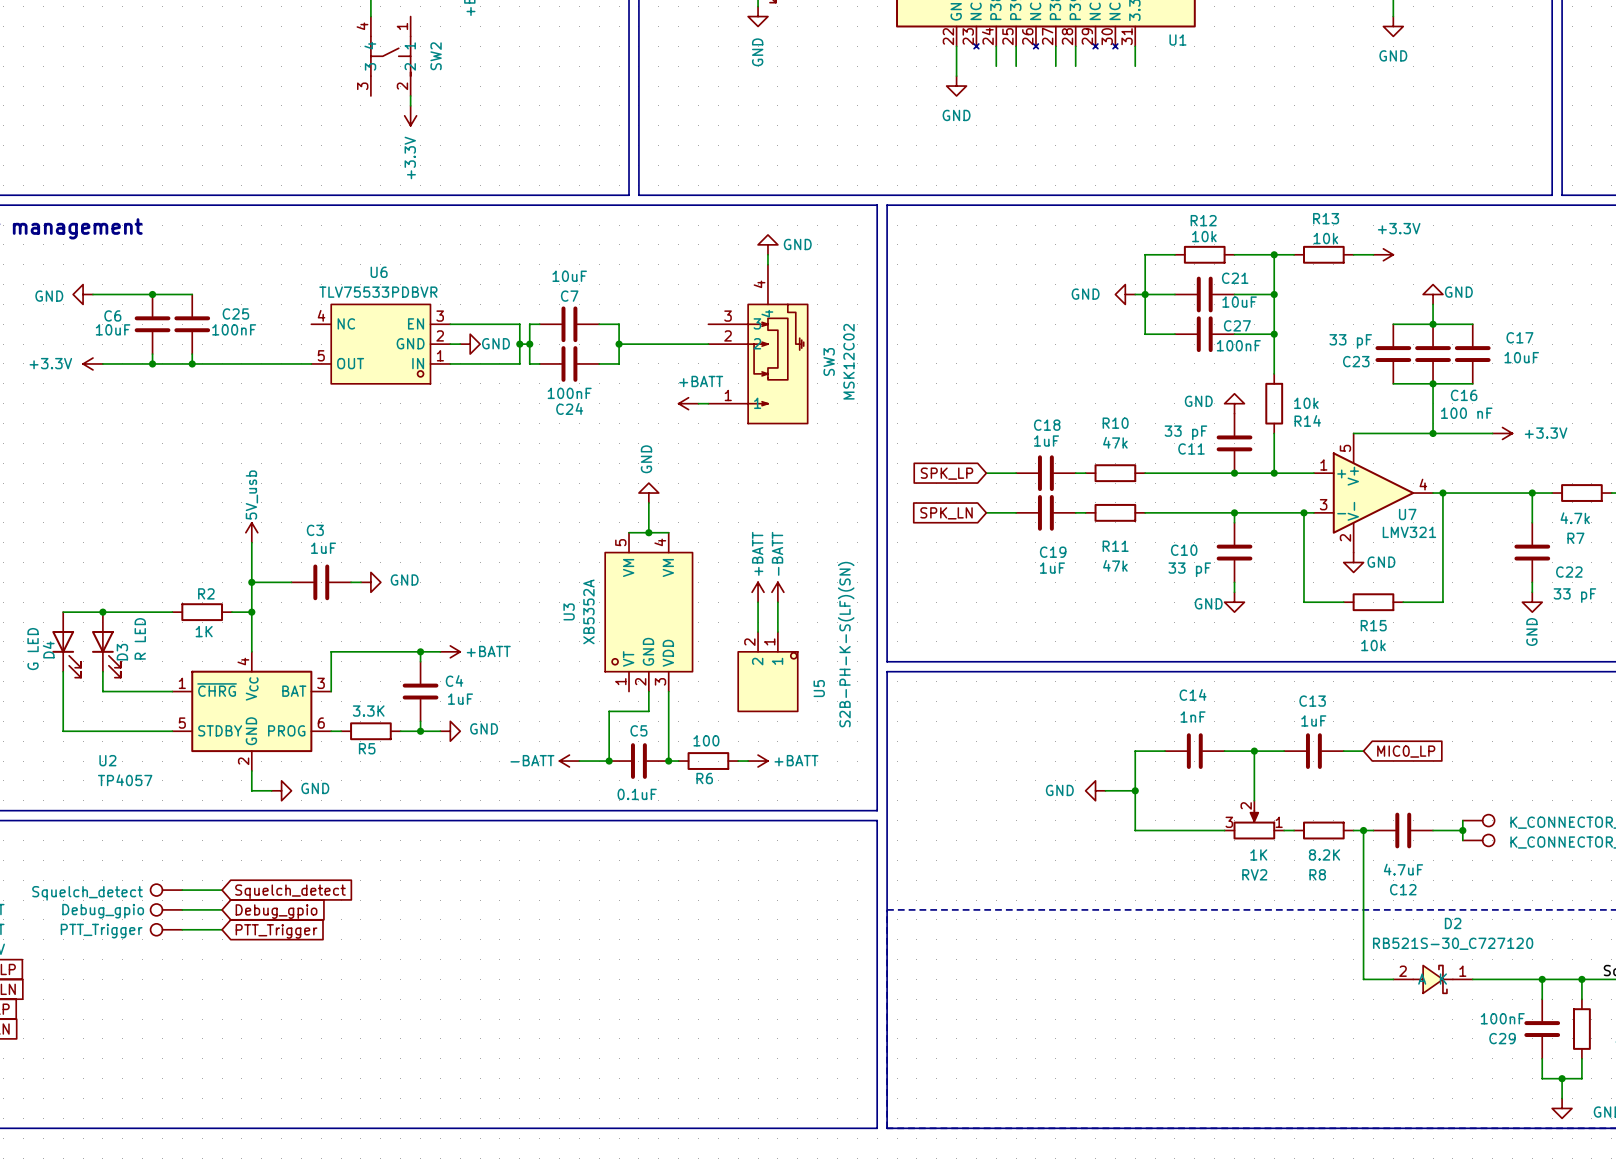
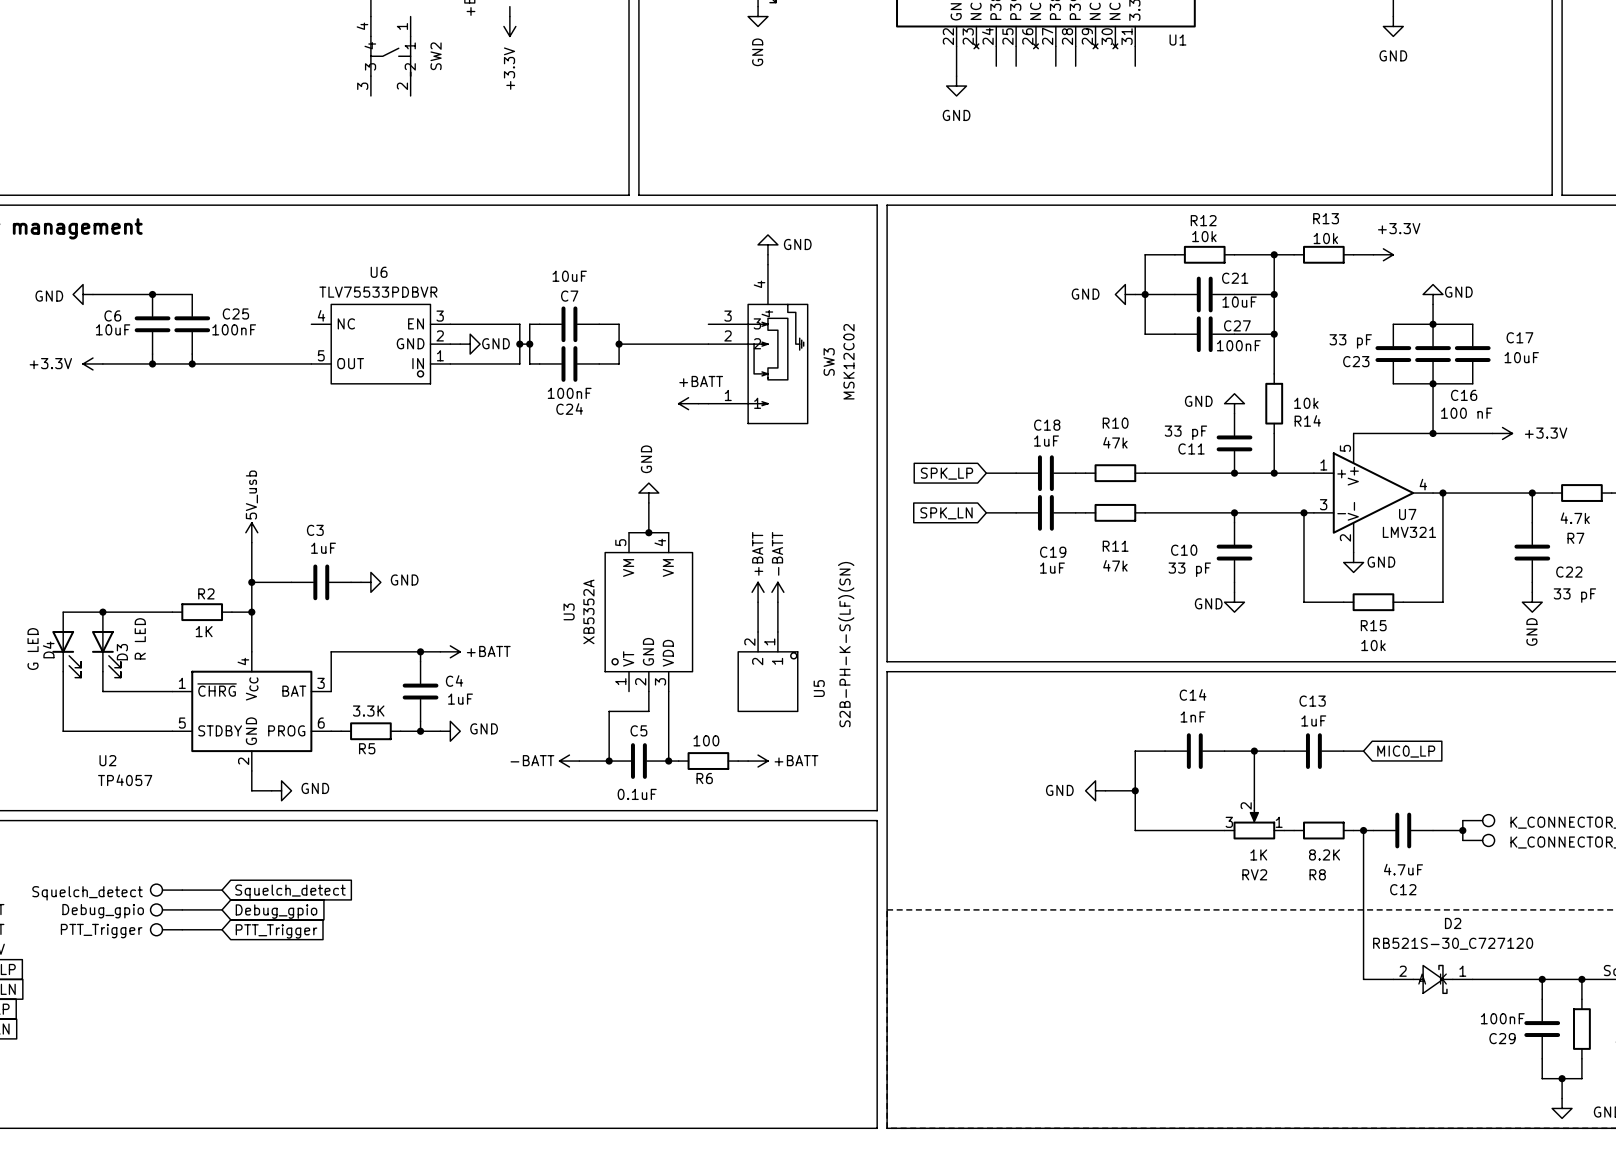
wire: (410, 95) (410, 105) -> (509, 6) (509, 16)
power symbol position: +3.3V (410, 115) -> +3.3V (509, 26)

